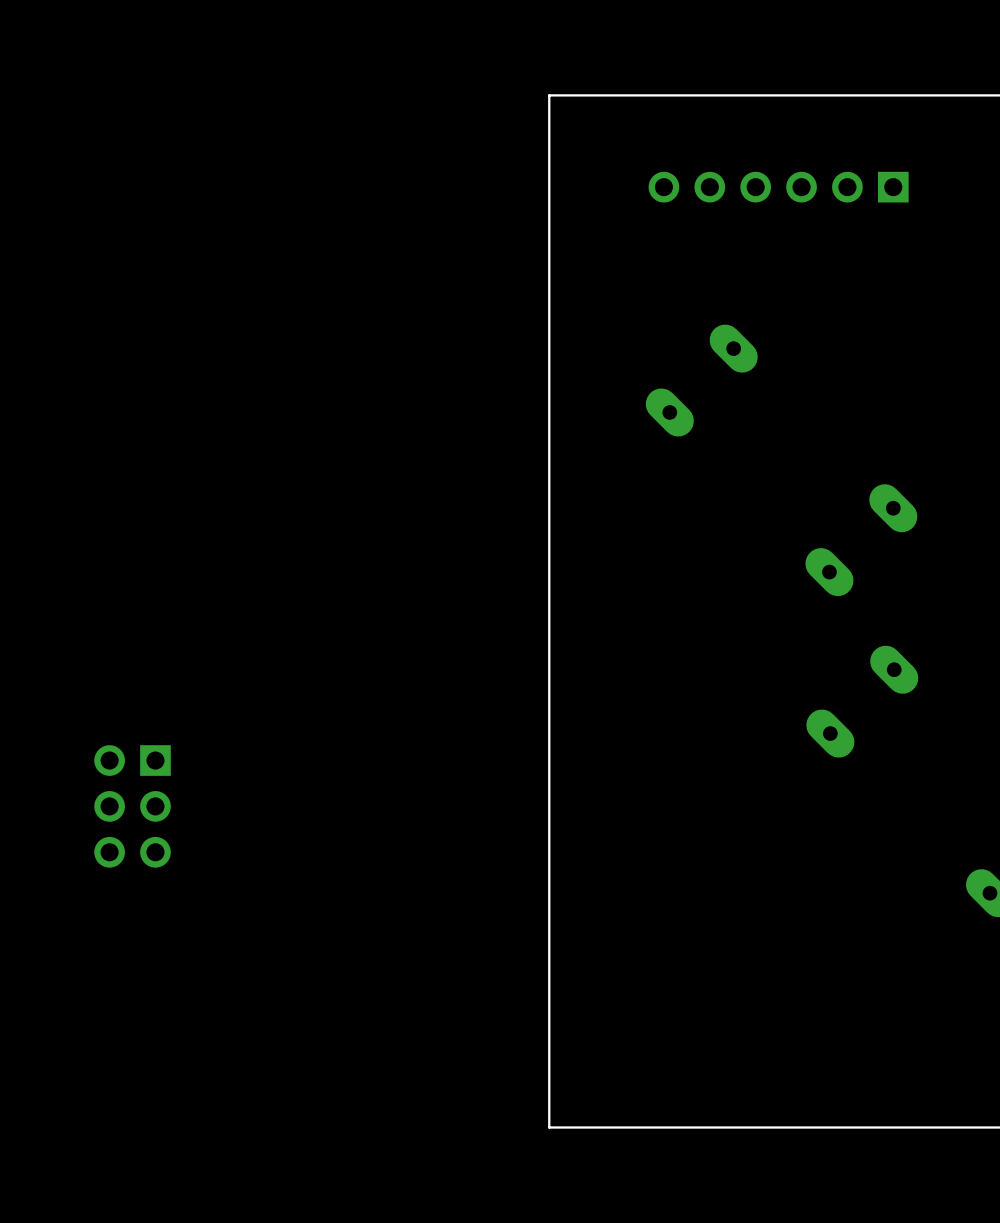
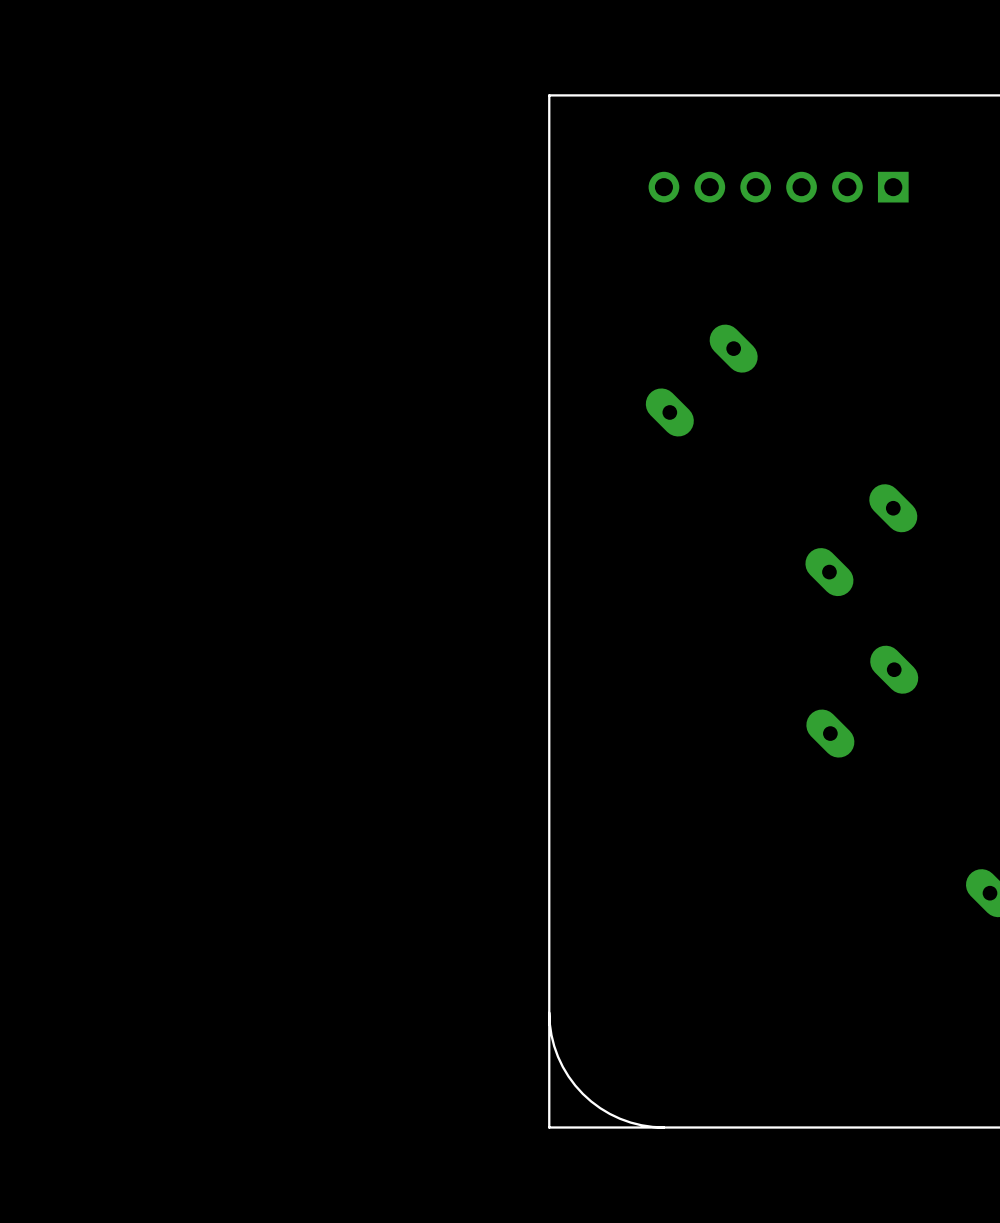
part: (132, 806) -> none
board edge: none -> (549, 1012) (551, 1035) (557, 1056) (568, 1076) (582, 1093) (600, 1108) (620, 1118) (641, 1125) (663, 1127)

